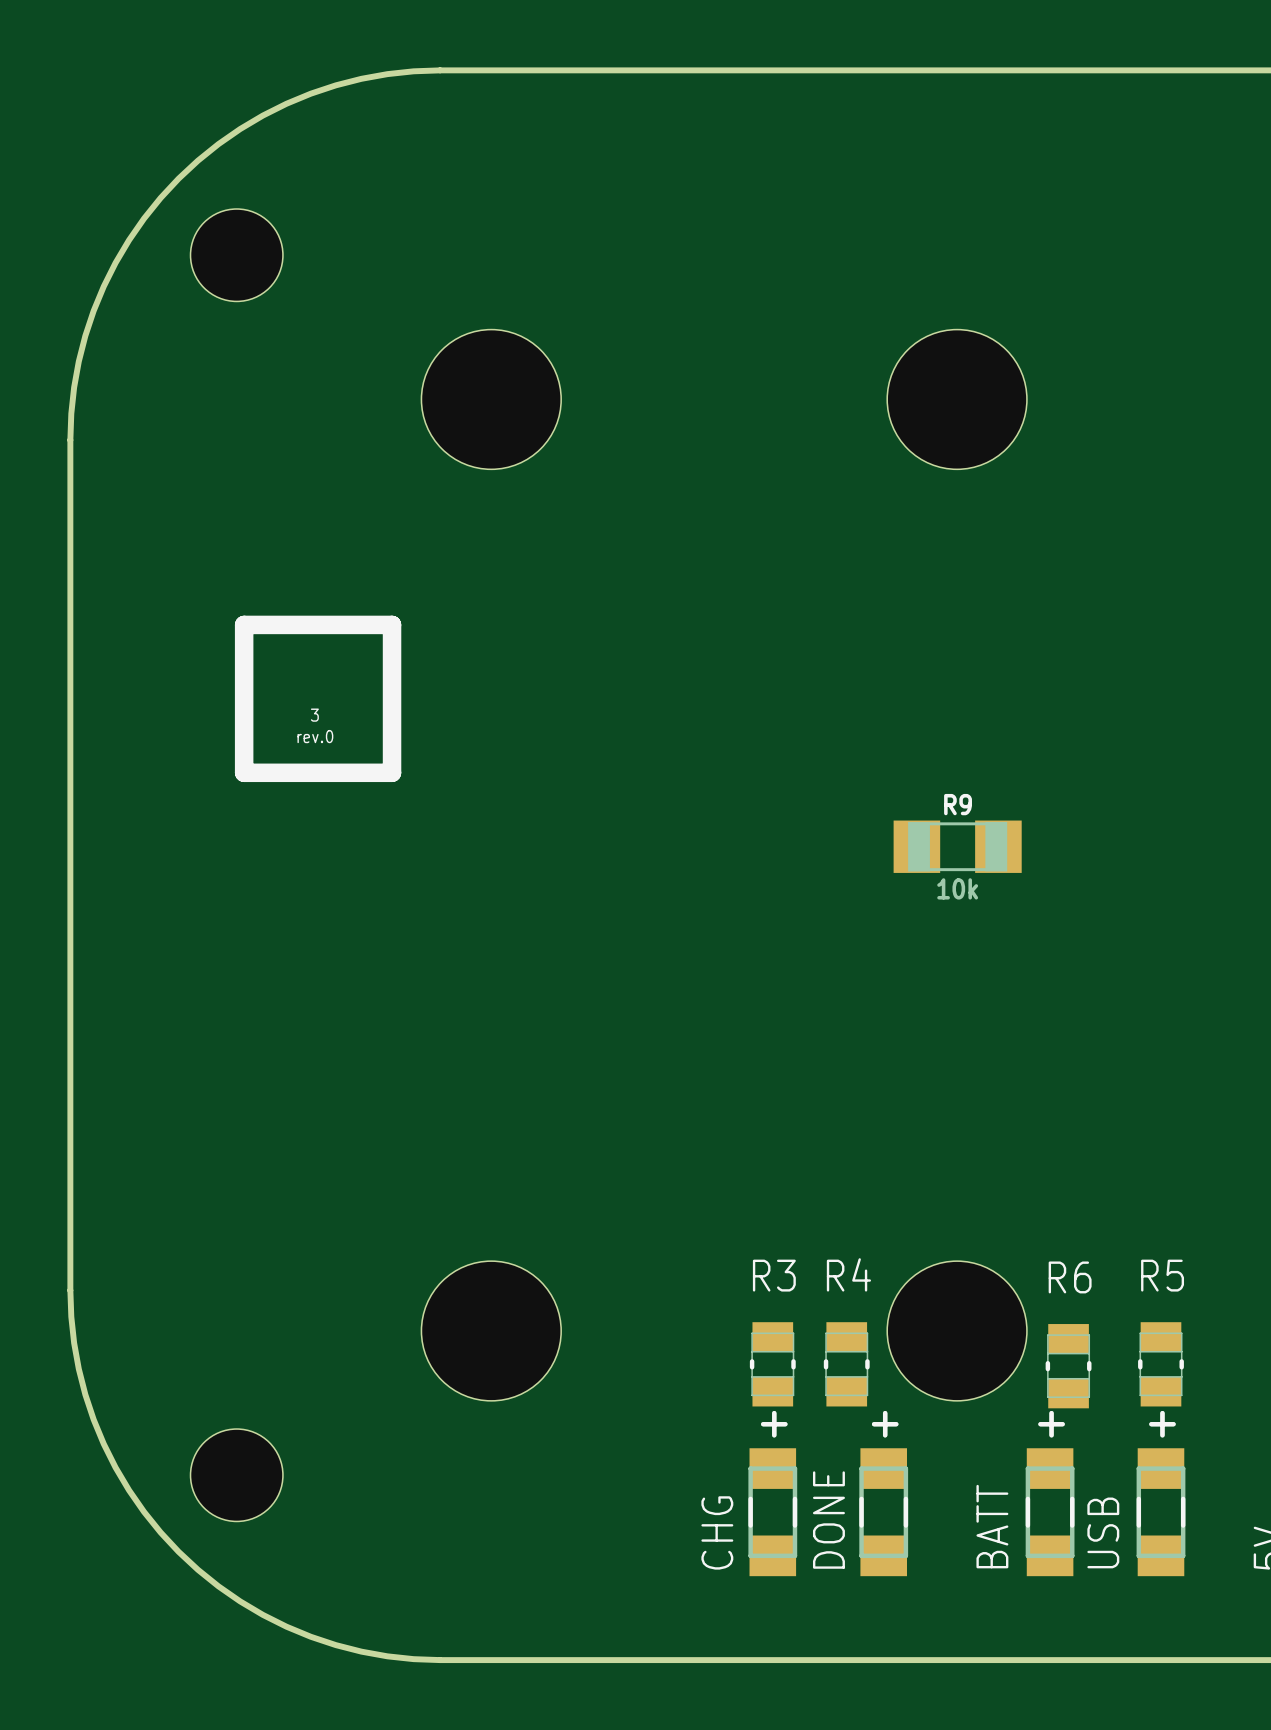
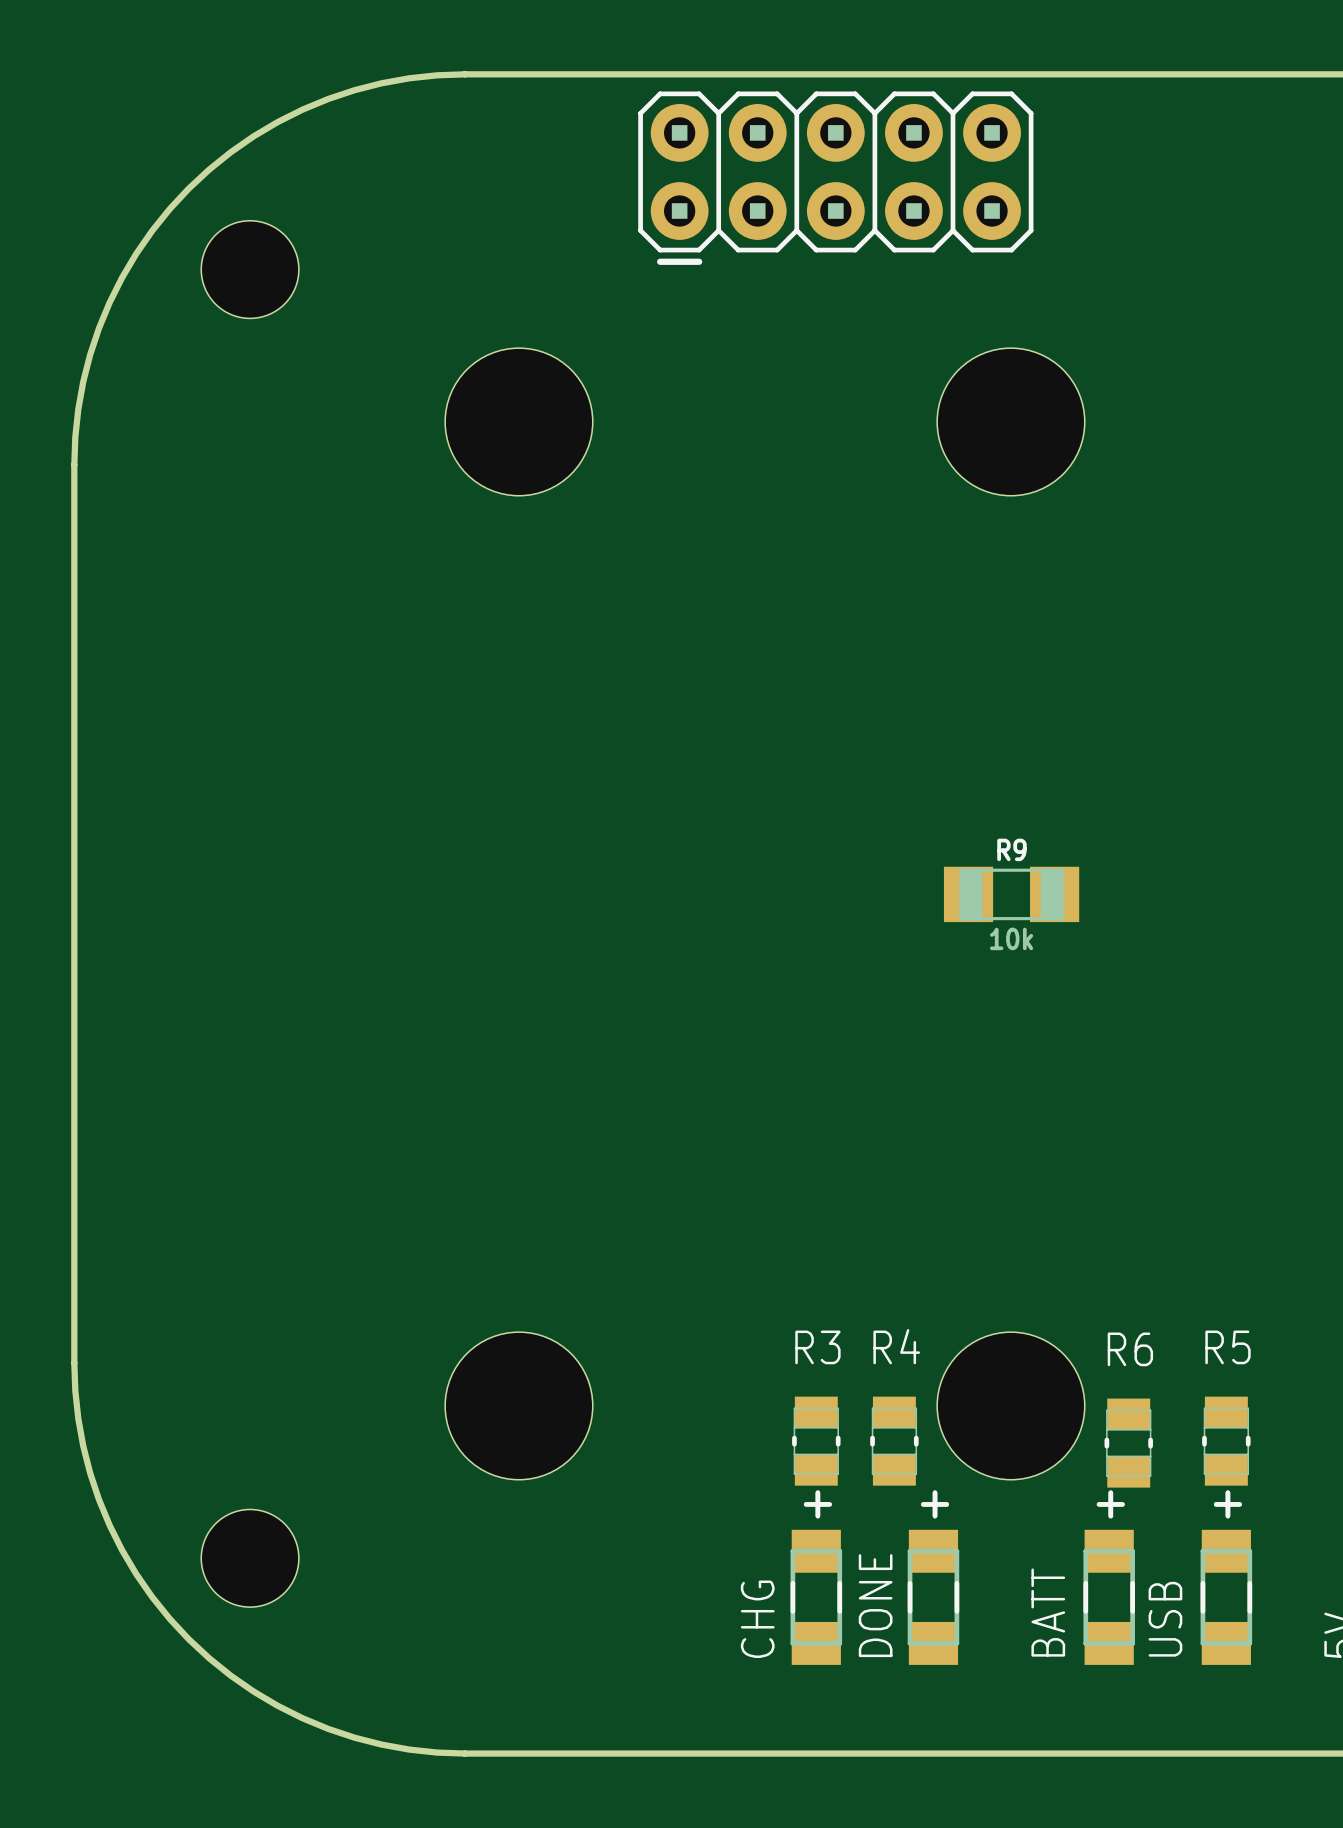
part: none -> (835, 178)
3: rev.0 (318, 698) -> none

